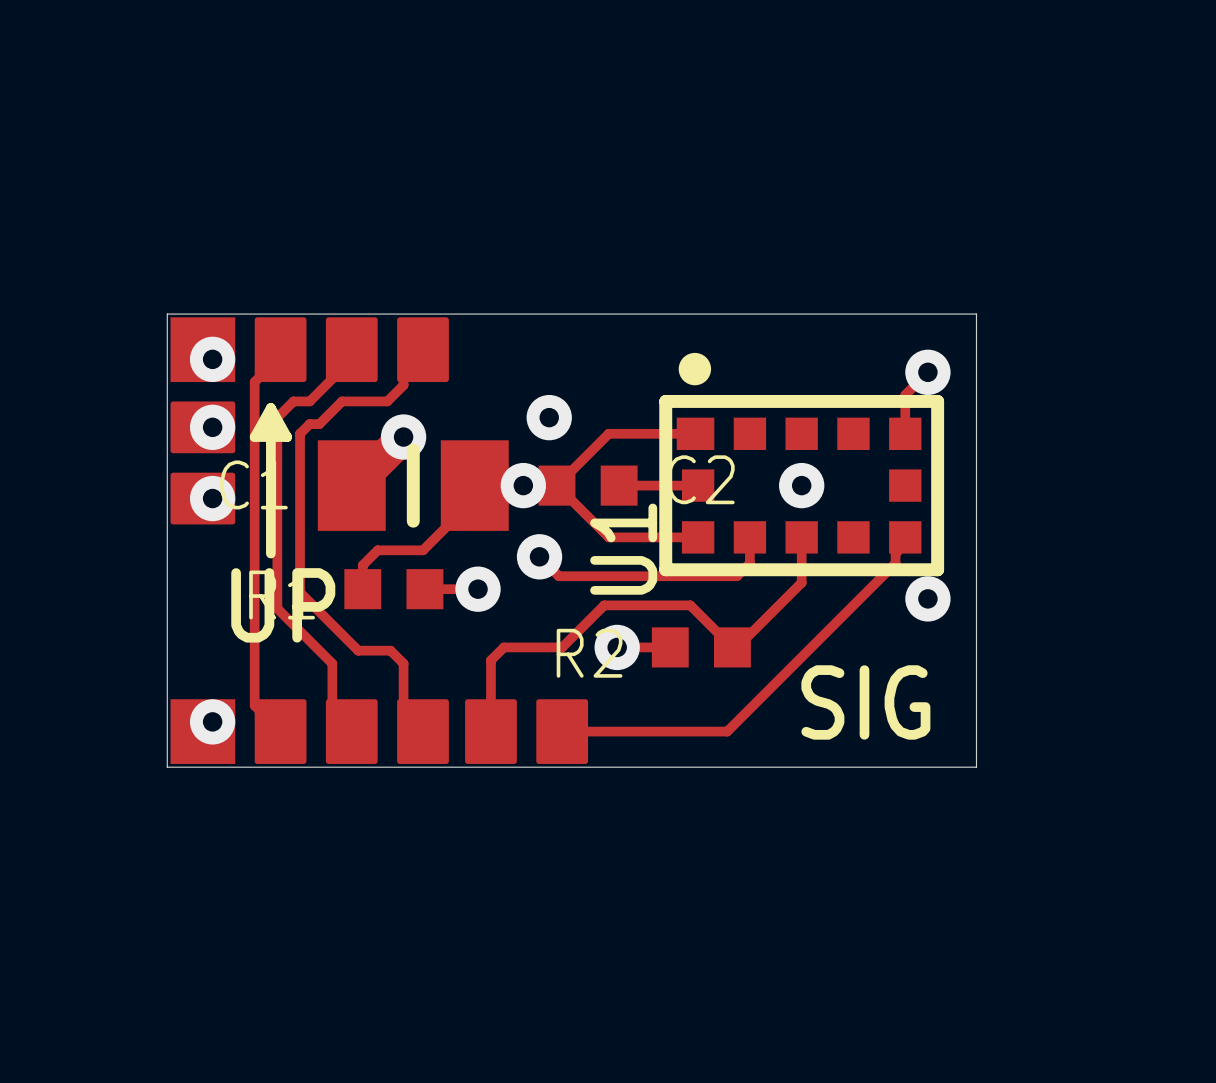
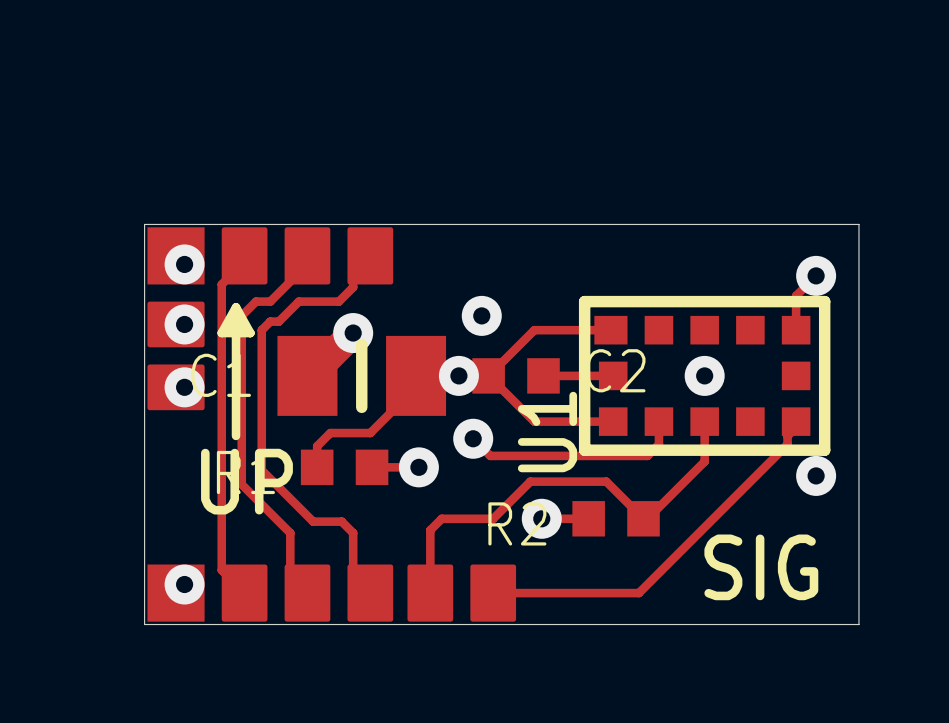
drawing: [678, 352, 712, 386] -> none

